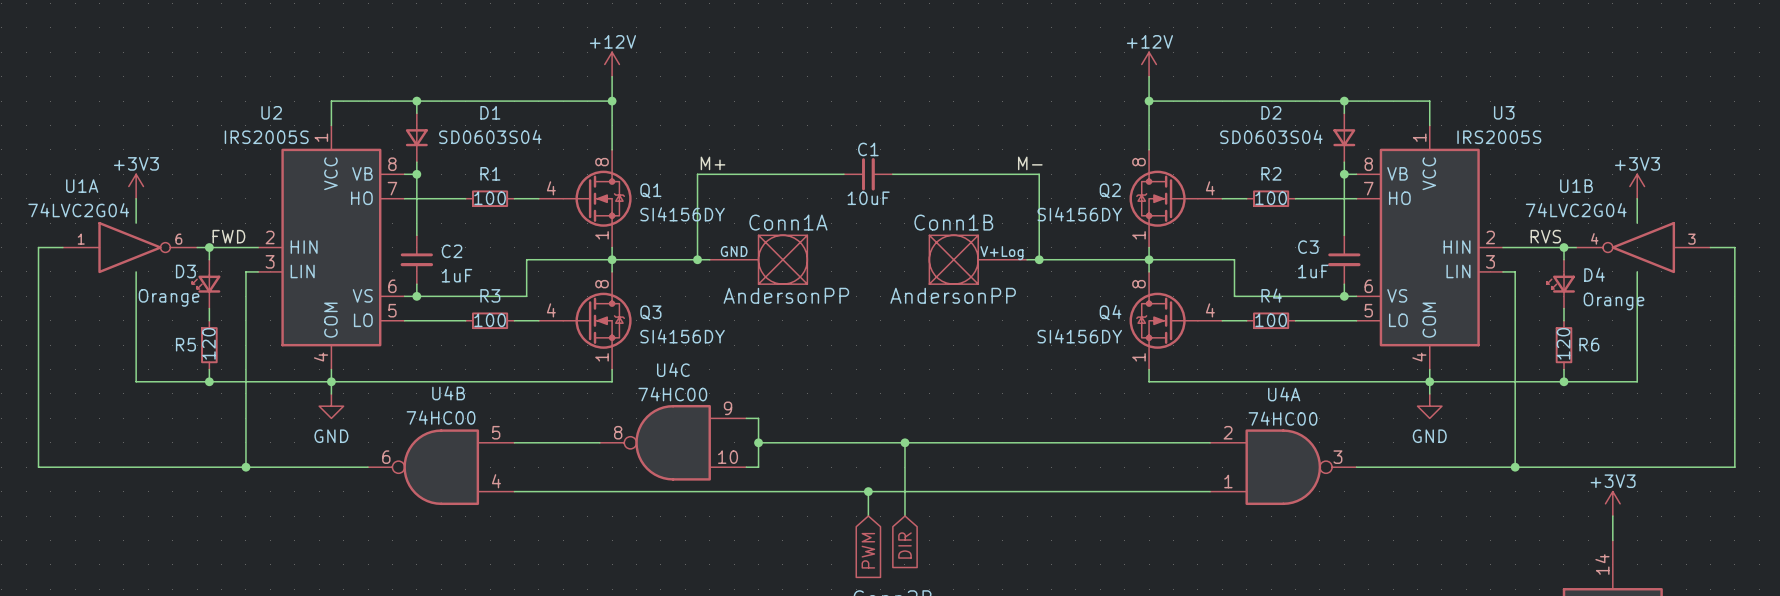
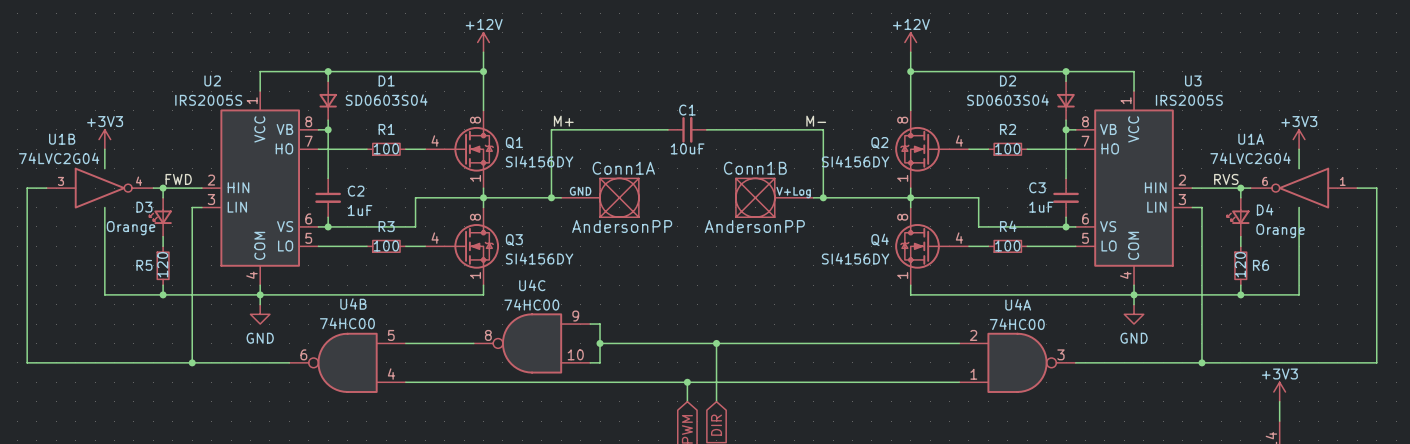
U1A name position: U1A (82, 186) -> U1A (1251, 139)
U1B name position: U1B (1576, 186) -> U1B (62, 139)
U1A rotation: 0° (130, 247) -> 180° (1303, 188)
U1A position: (130, 247) -> (1303, 188)
U1B rotation: 0° (1643, 247) -> 180° (99, 188)
U1B position: (1643, 247) -> (99, 188)

